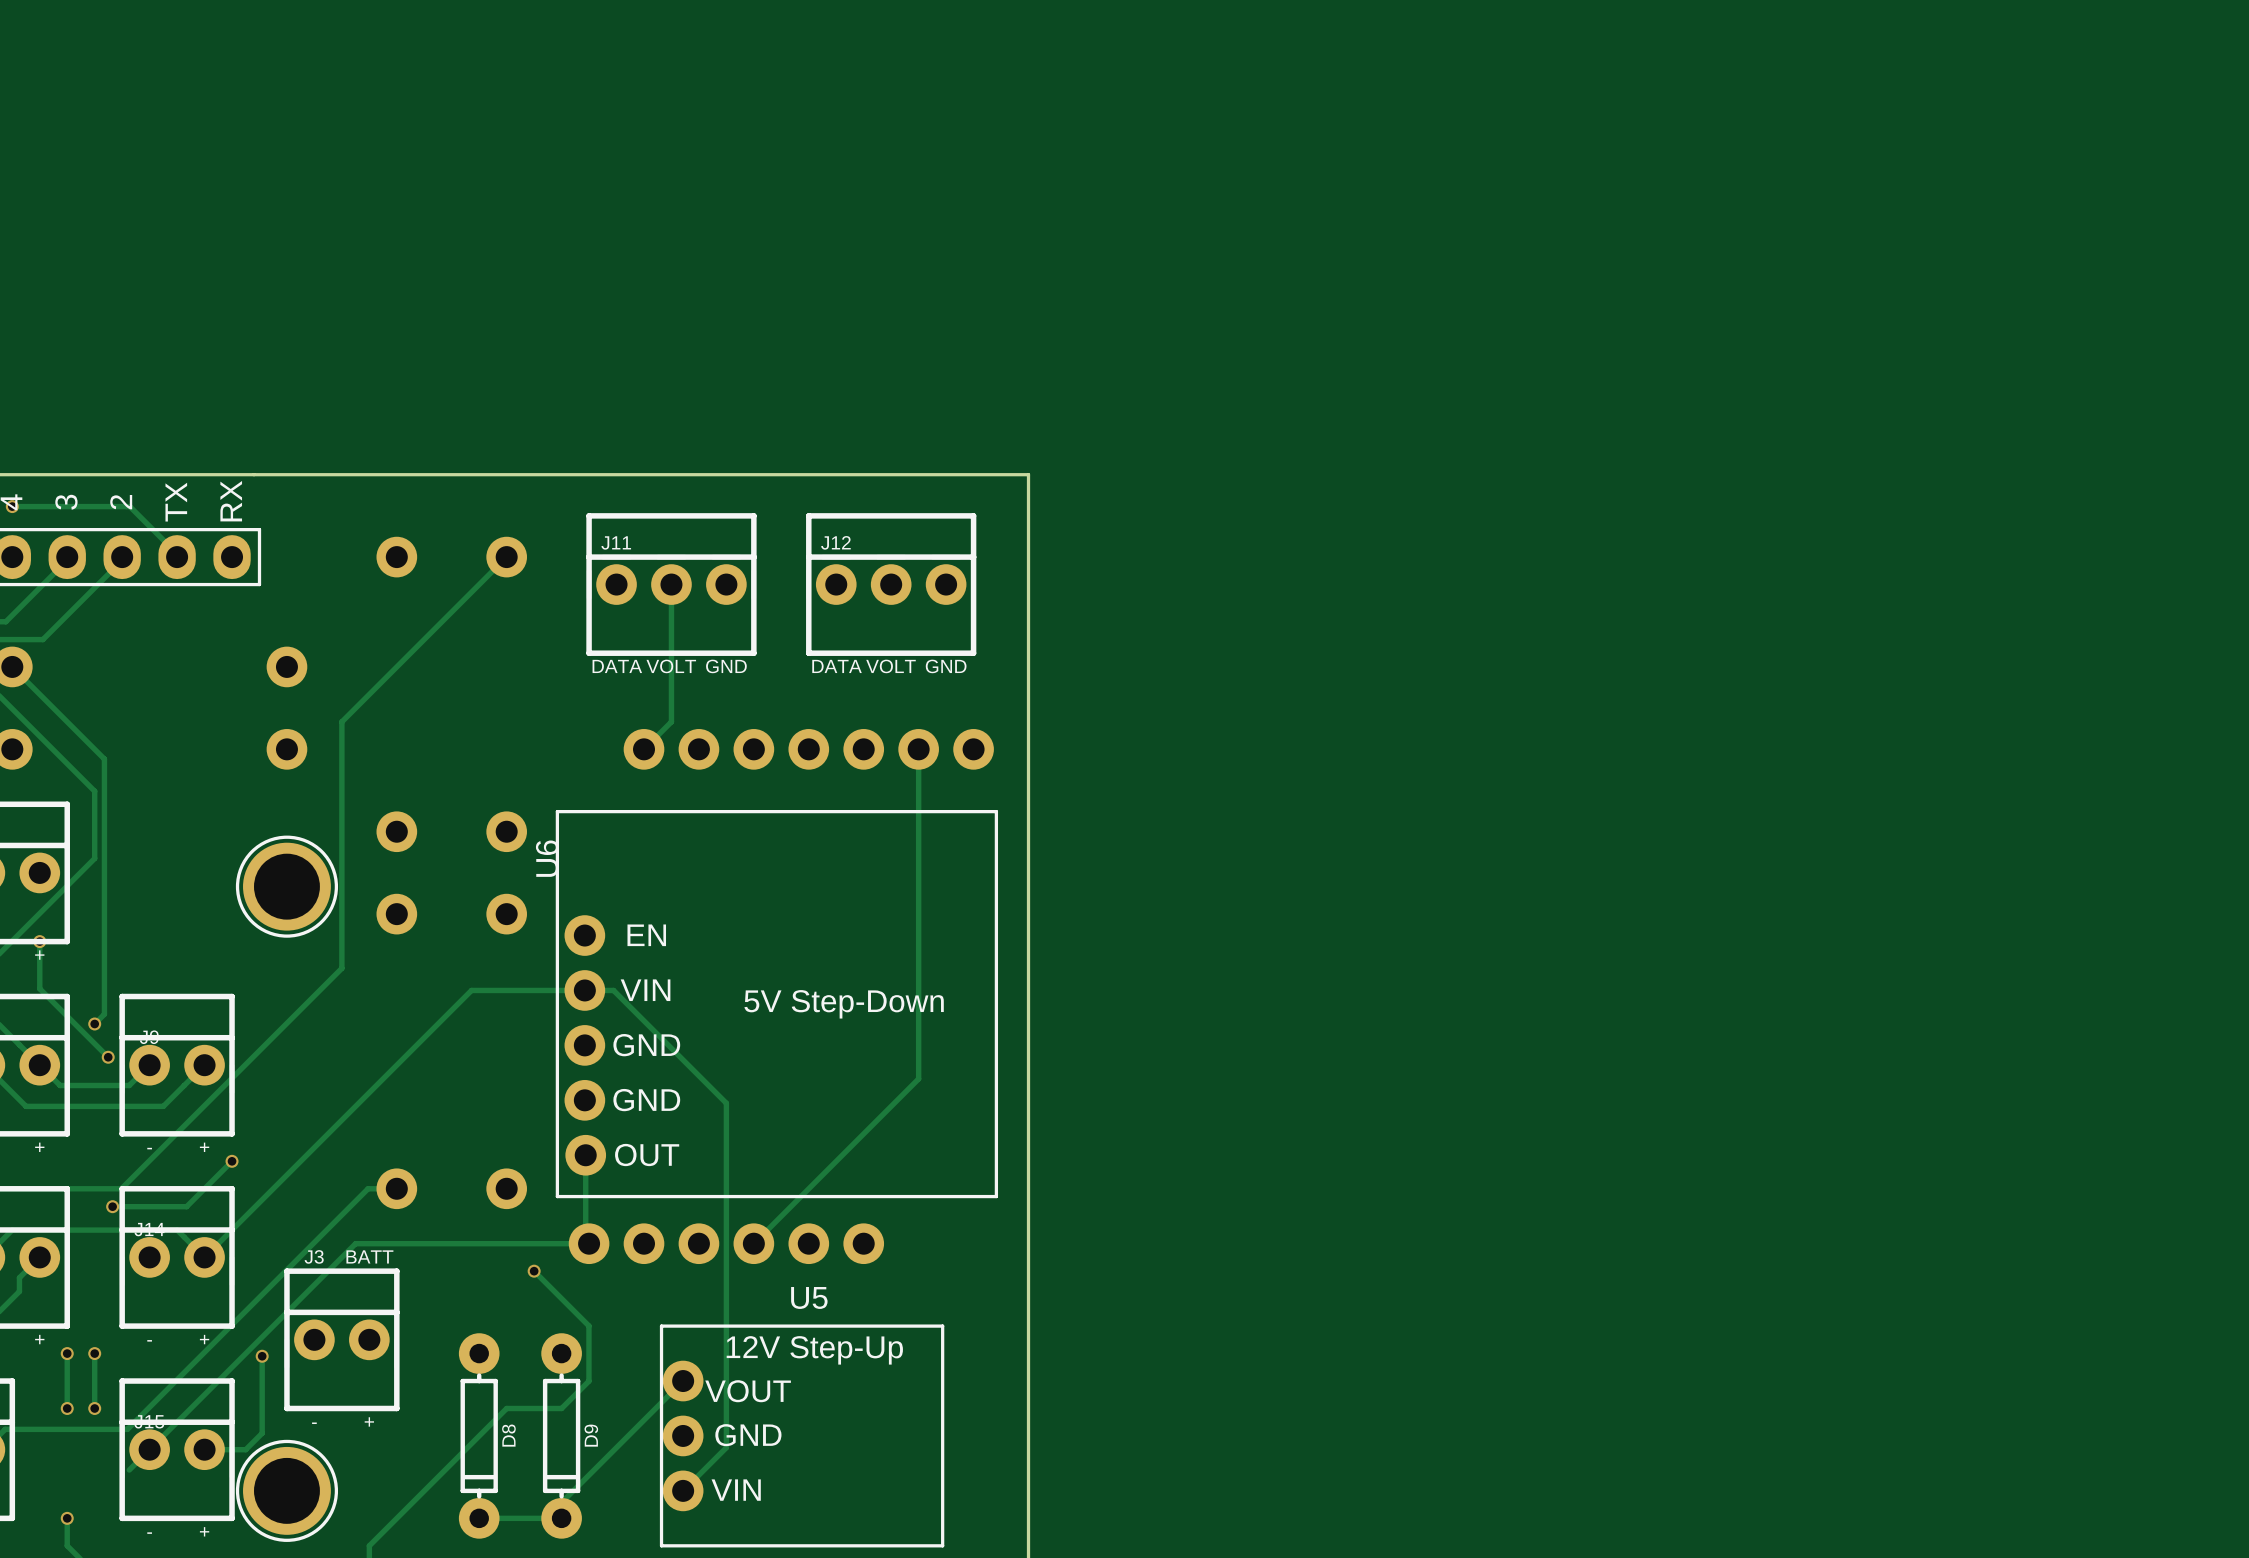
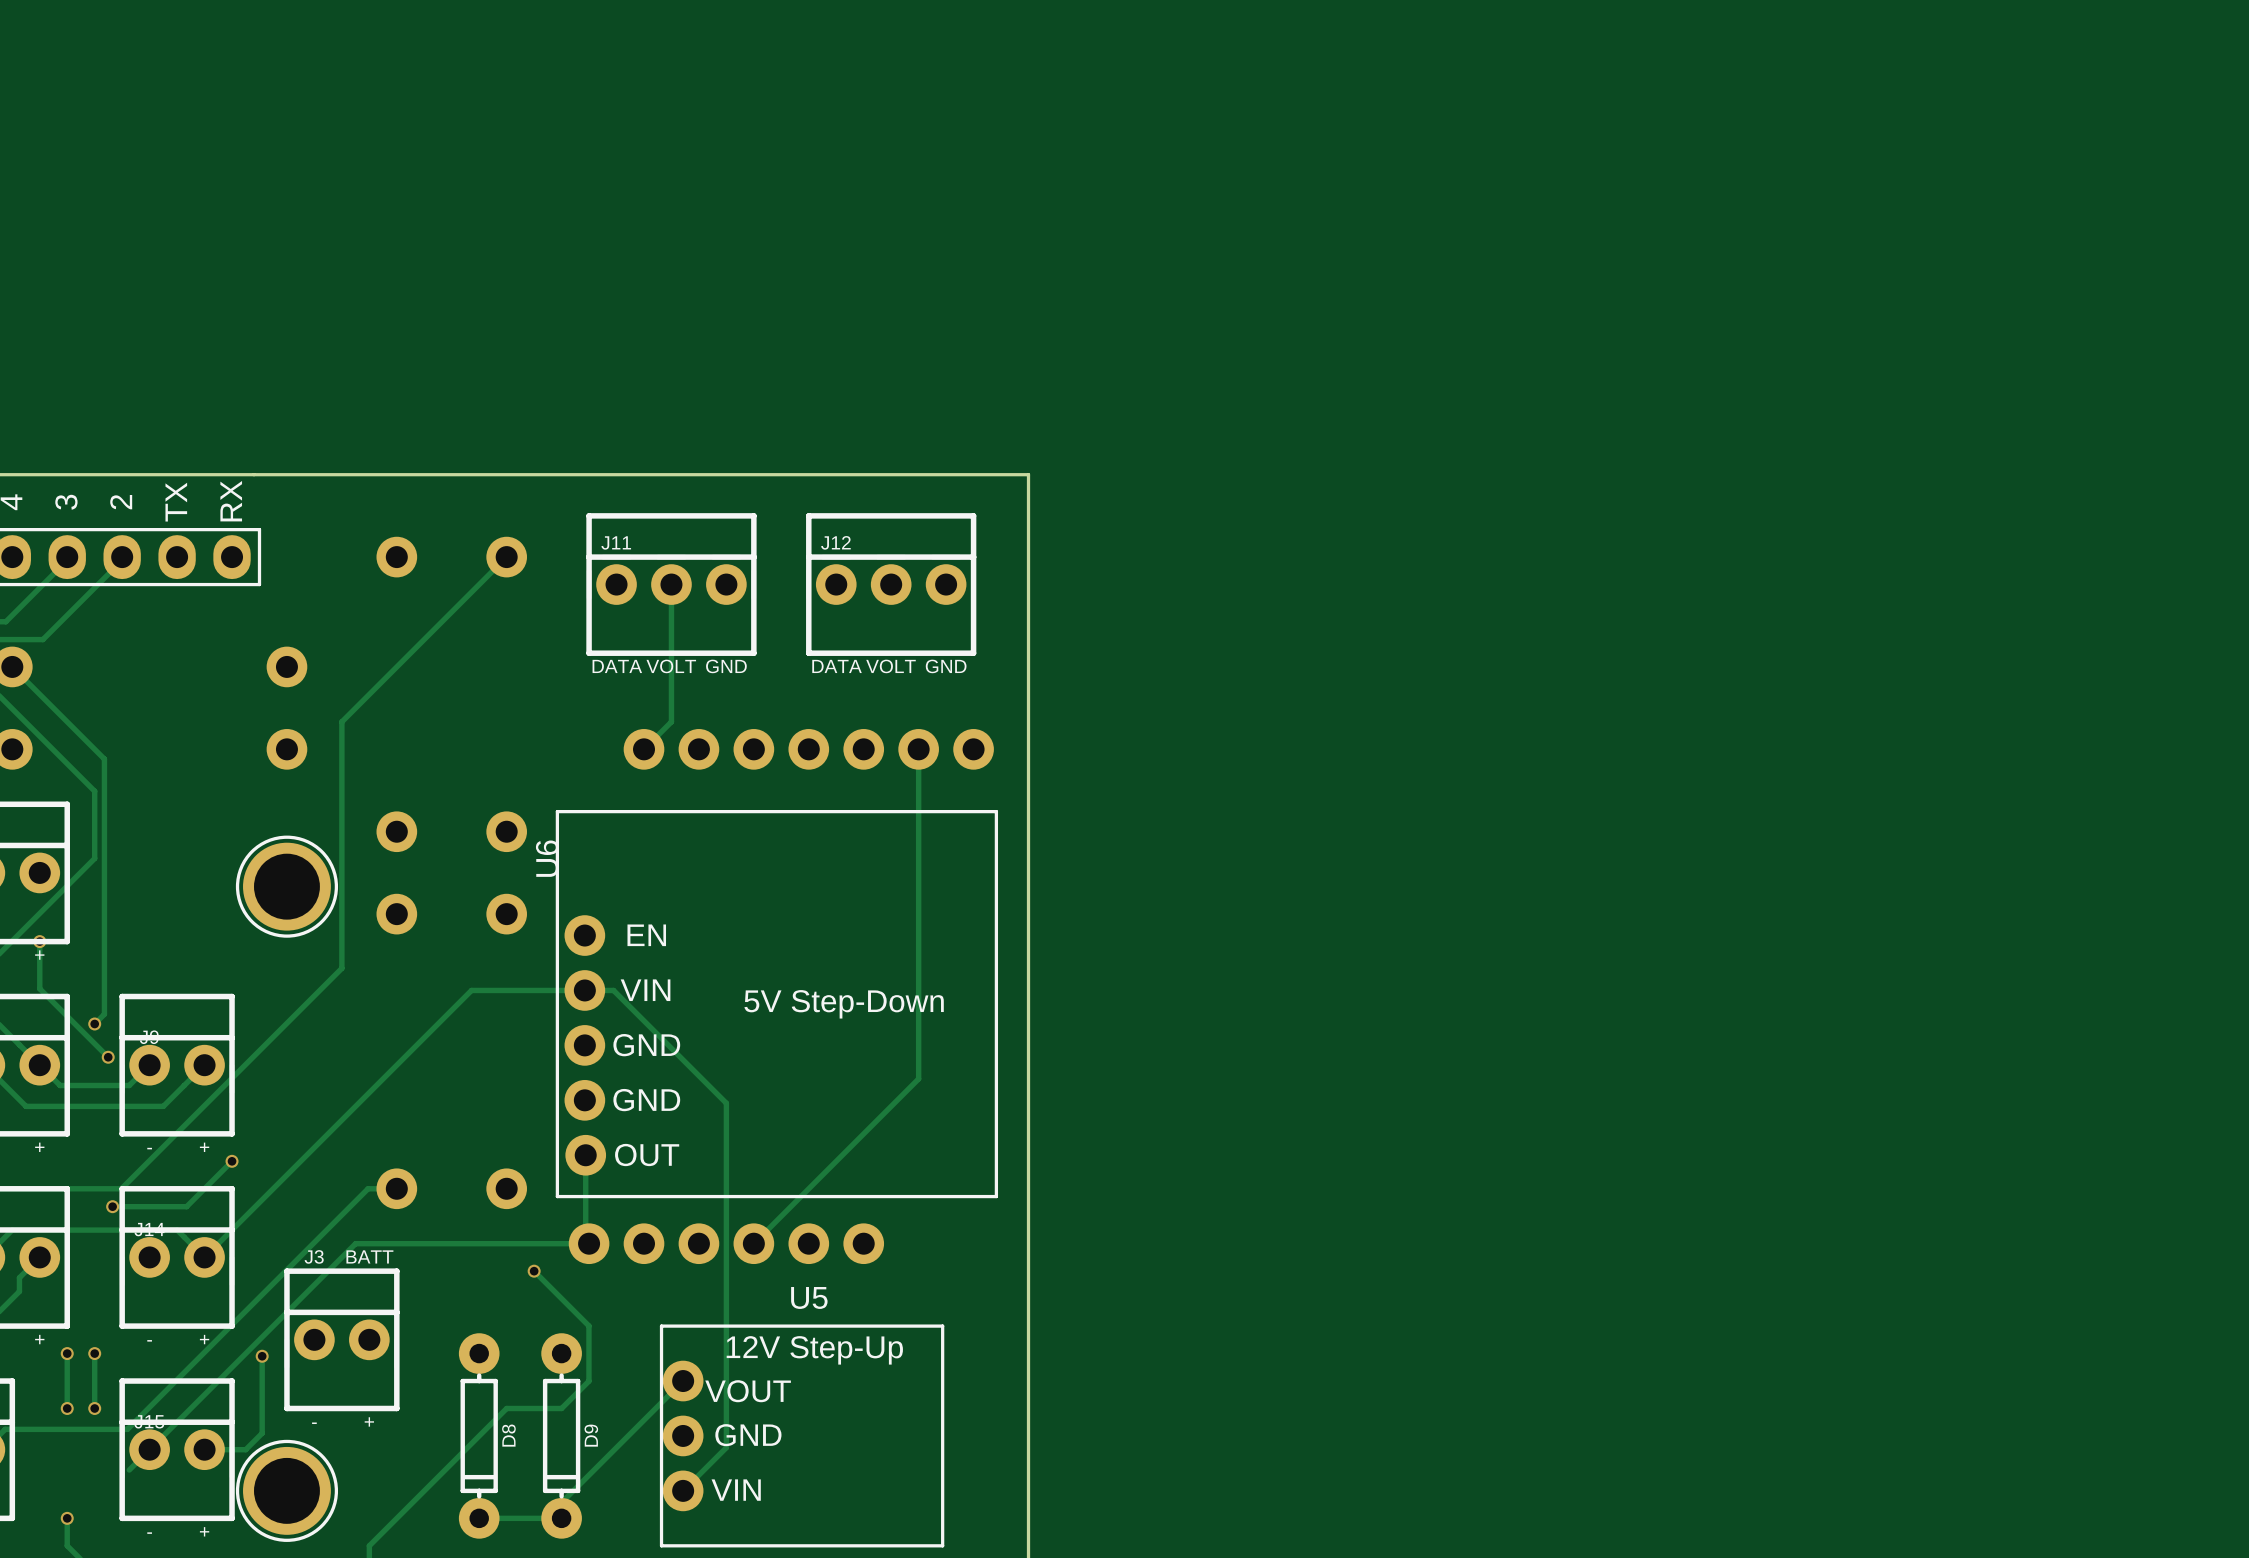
track: (12, 506) (129, 506) (177, 553) (177, 557) -> none
via: (12, 506) -> none

